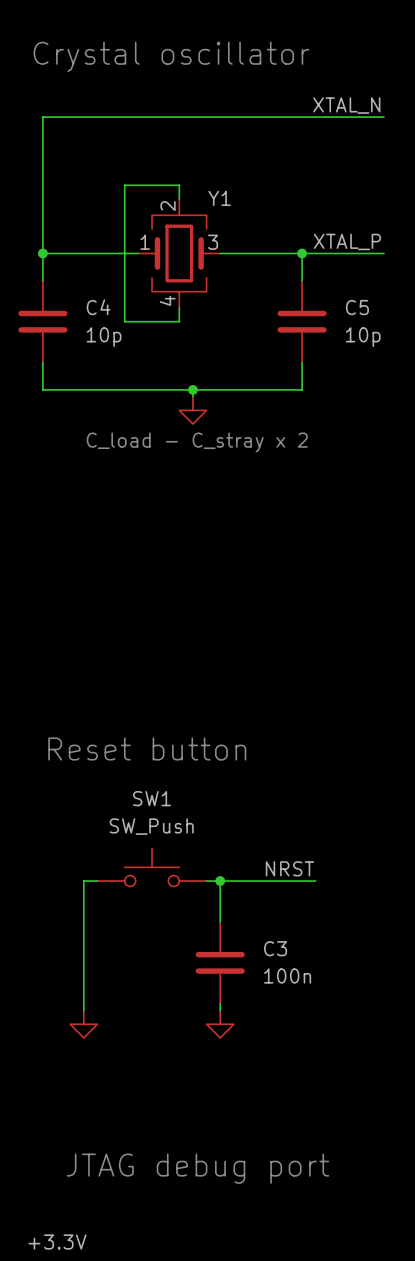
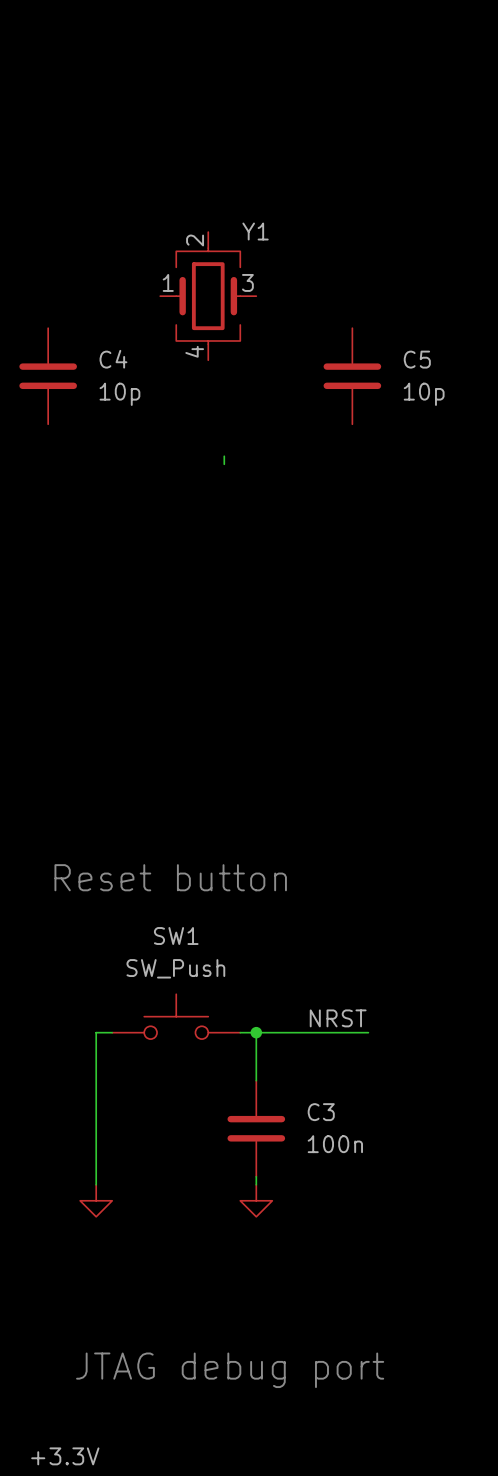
text: Crystal oscillator (171, 56) -> none
label: XTAL_N (346, 105) -> none
wire: (383, 117) (42, 117) (42, 280) -> none
wire: (179, 198) (179, 185) (124, 185) (124, 321) (179, 321) (179, 308) -> none
label: XTAL_P (347, 241) -> none
wire: (42, 253) (138, 253) -> none
junction: (42, 253) -> none
wire: (220, 253) (383, 253) -> none
wire: (302, 253) (302, 280) -> none
junction: (302, 253) -> none
wire: (42, 362) (42, 389) (302, 389) (302, 362) -> none
junction: (192, 389) -> none
power symbol: (192, 410) -> none
text: C_load - C_stray x 2 (197, 442) -> none

